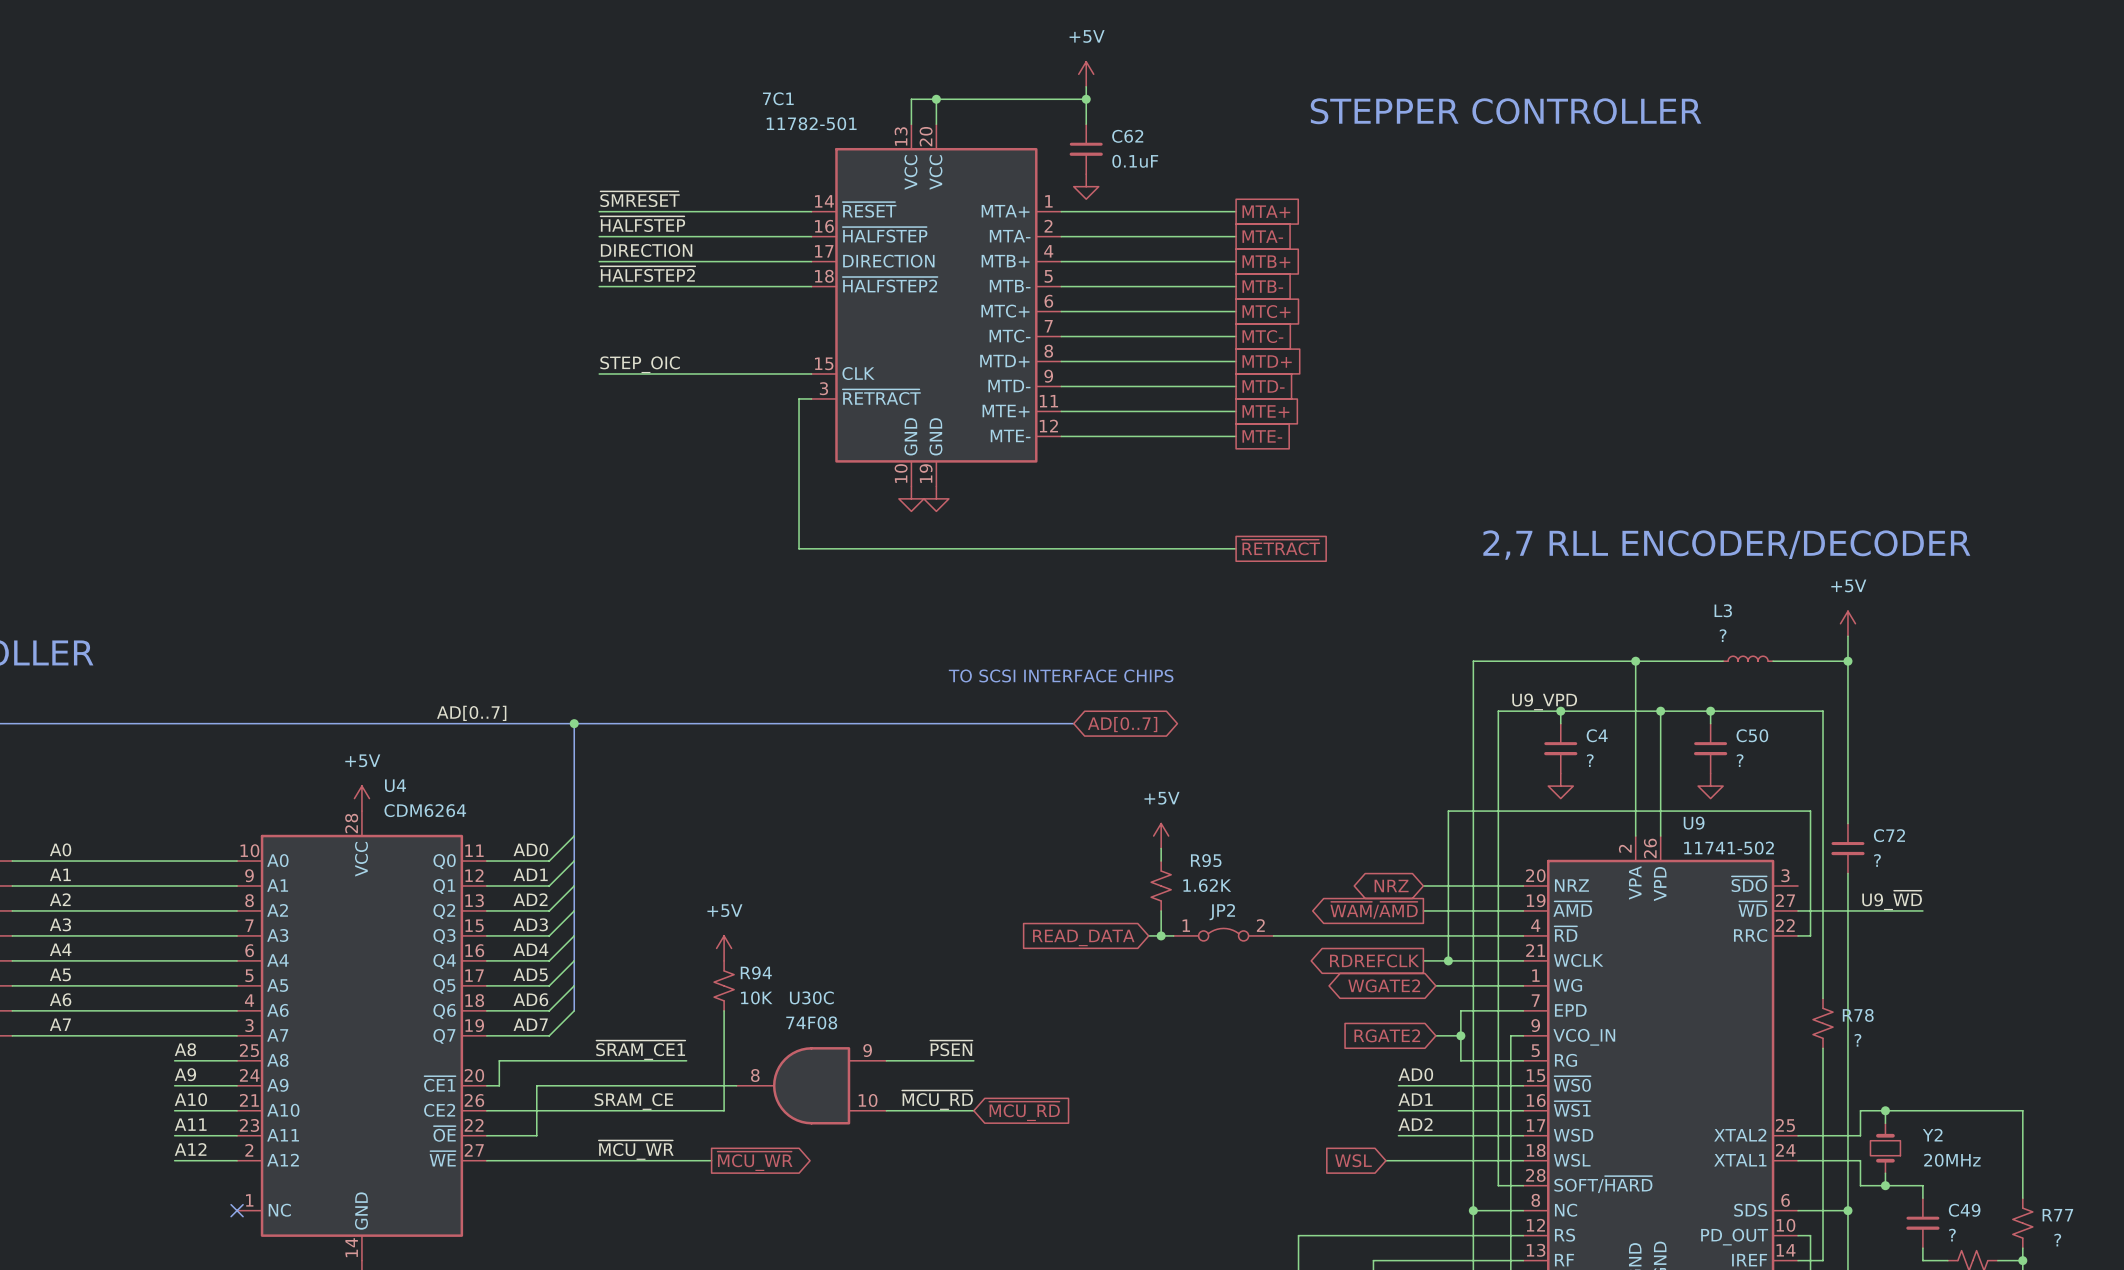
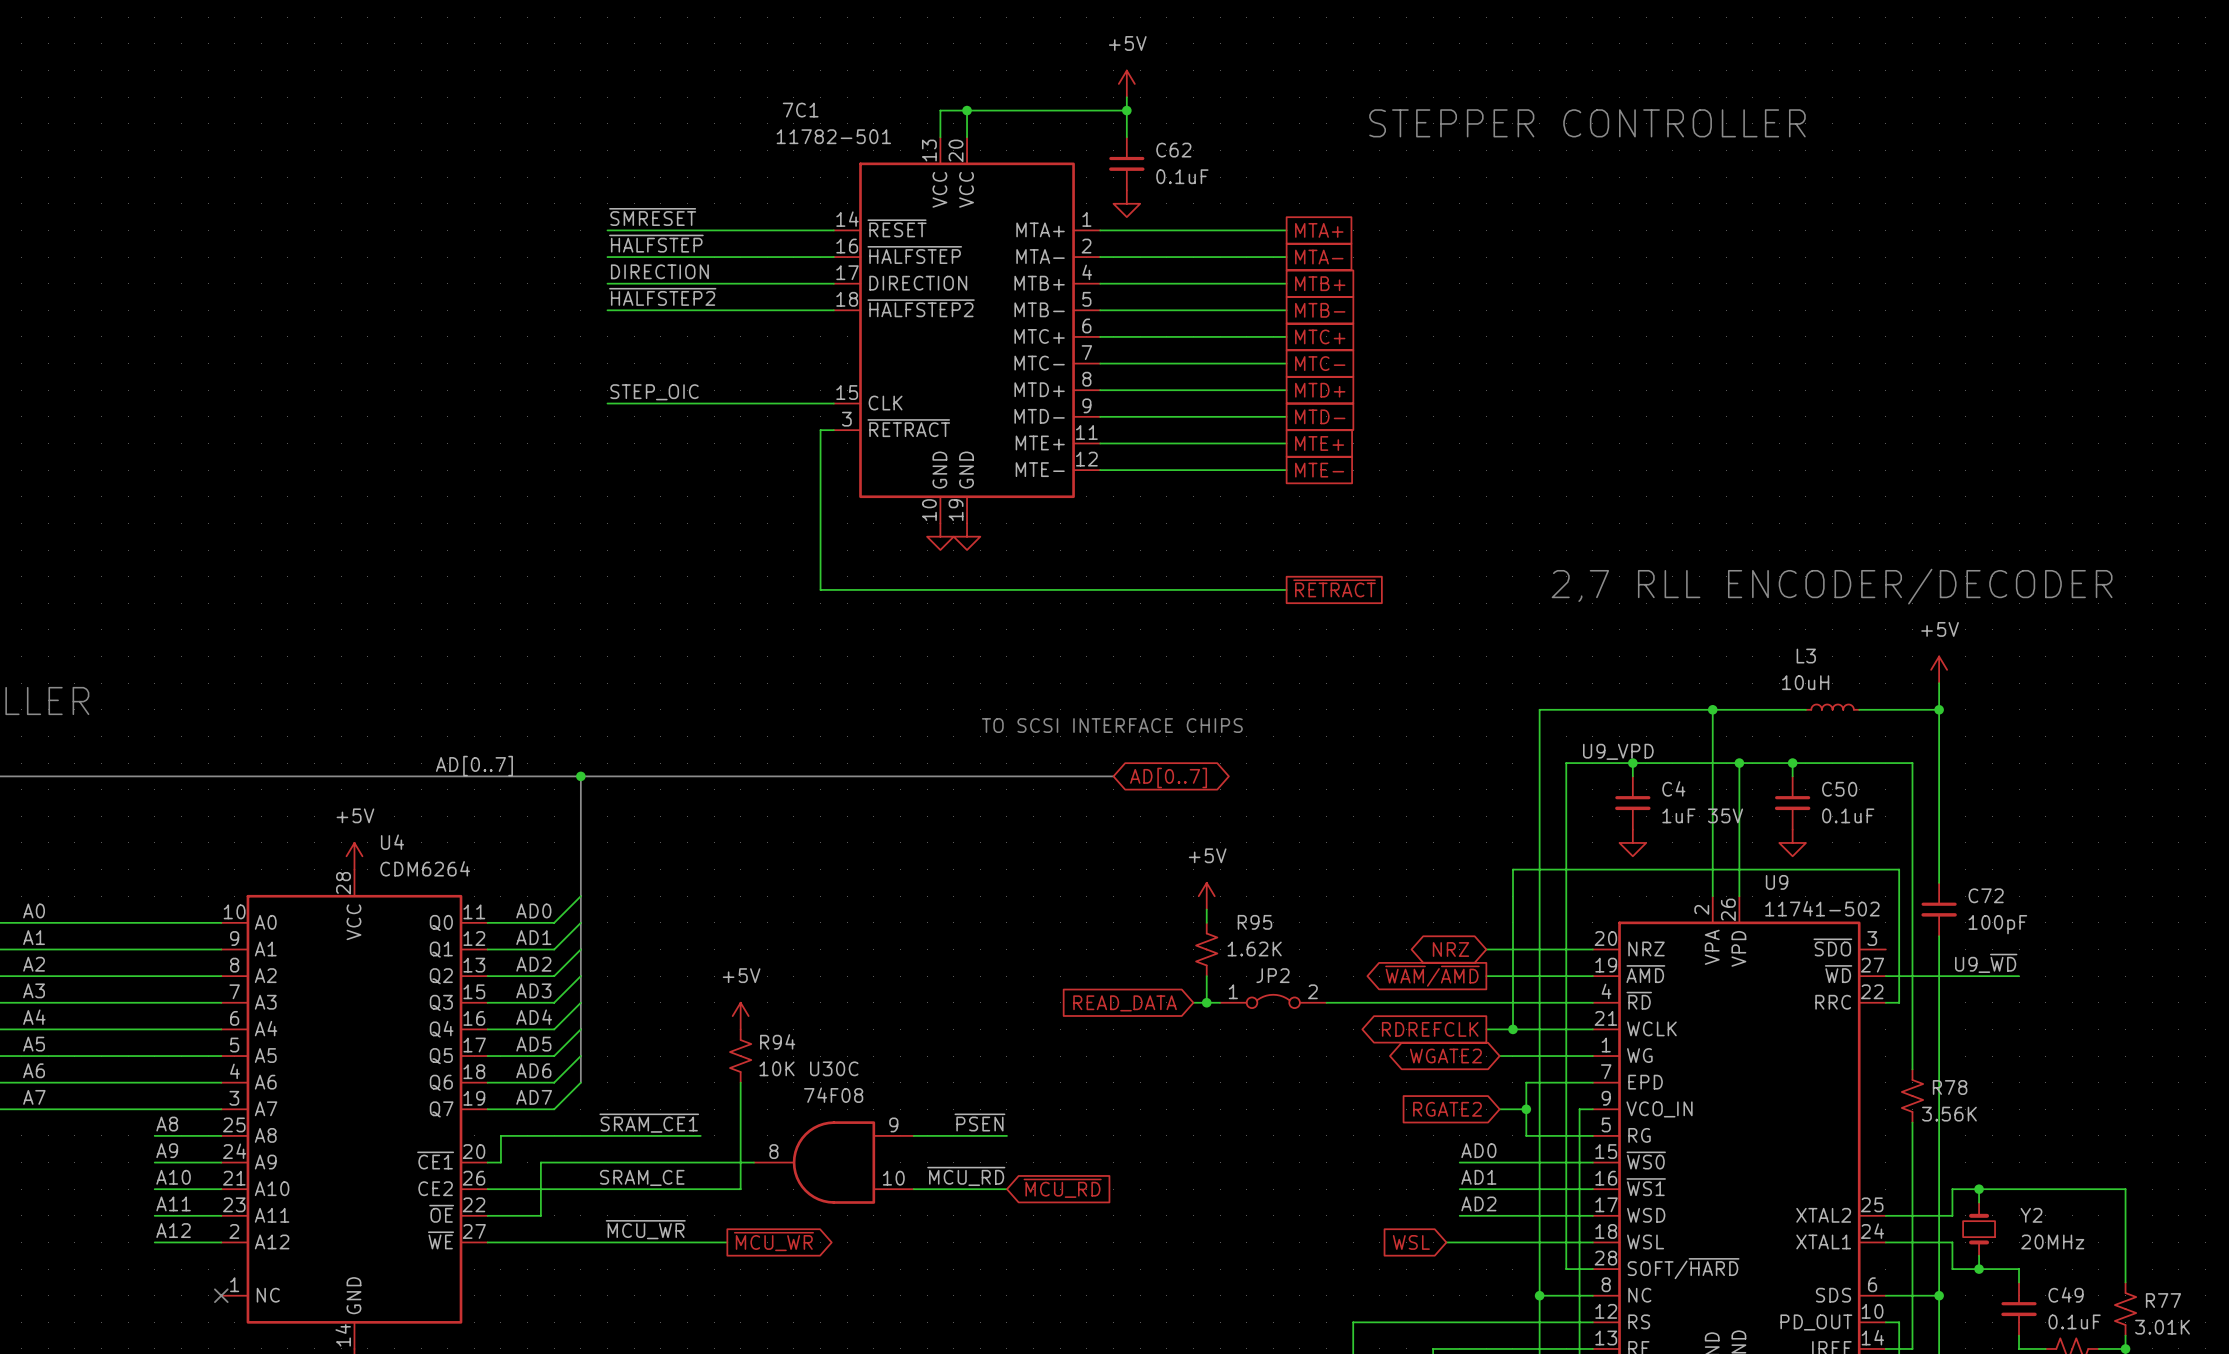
L3 value: ? (1723, 635) -> 10uH (1805, 682)
C4 value: ? (1590, 760) -> 1uF 35V (1702, 815)
C50 value: ? (1740, 760) -> 0.1uF (1848, 815)
C72 value: ? (1877, 860) -> 100pF (1997, 924)
R78 value: ? (1857, 1040) -> 3.56K (1949, 1114)
C49 value: ? (1952, 1235) -> 0.1uF (2074, 1321)
R77 value: ? (2057, 1240) -> 3.01K (2162, 1327)

